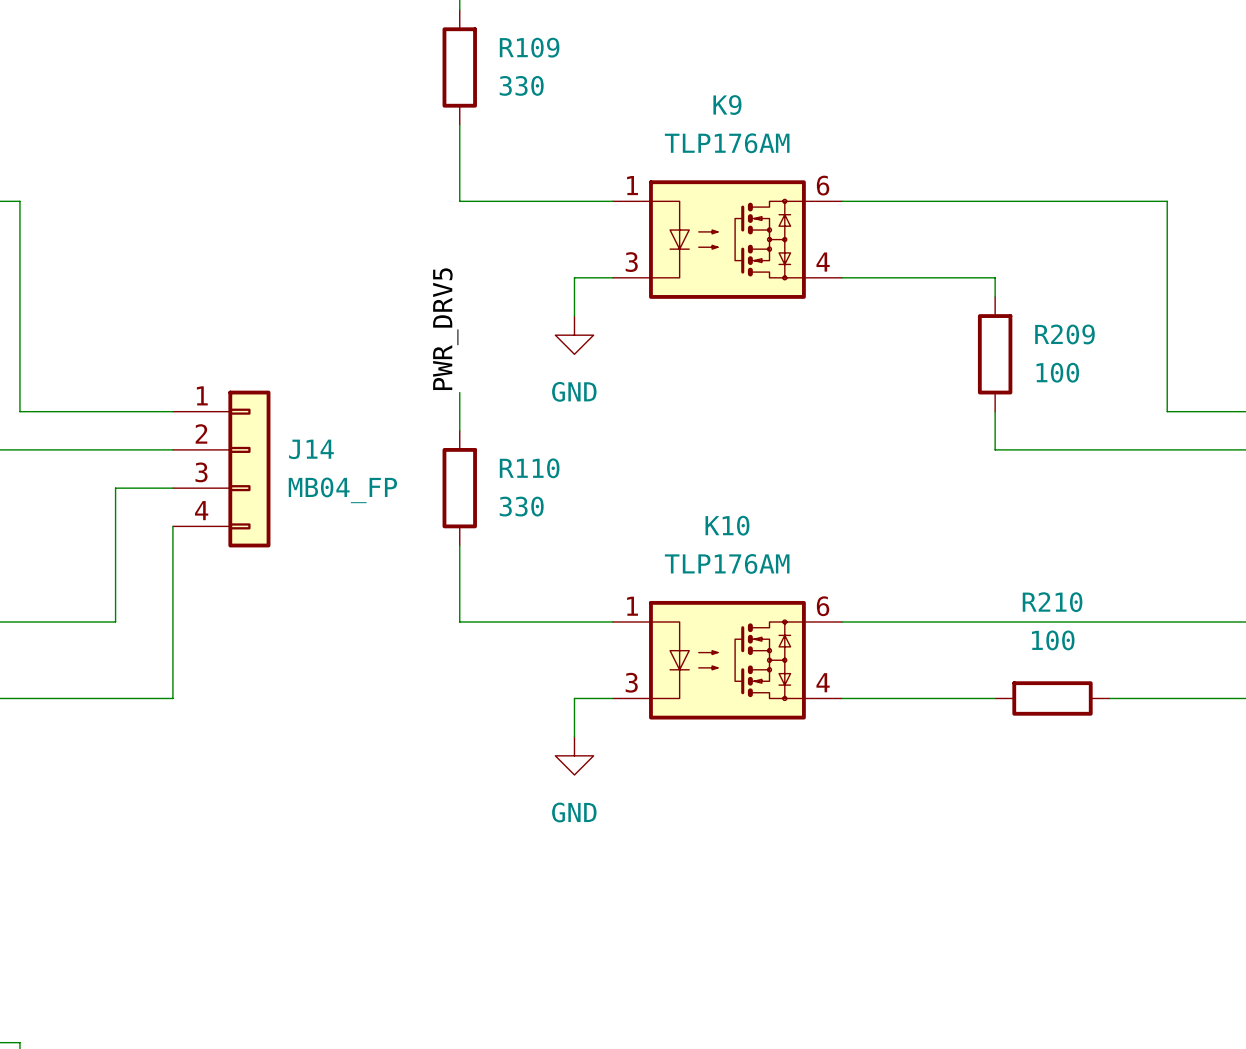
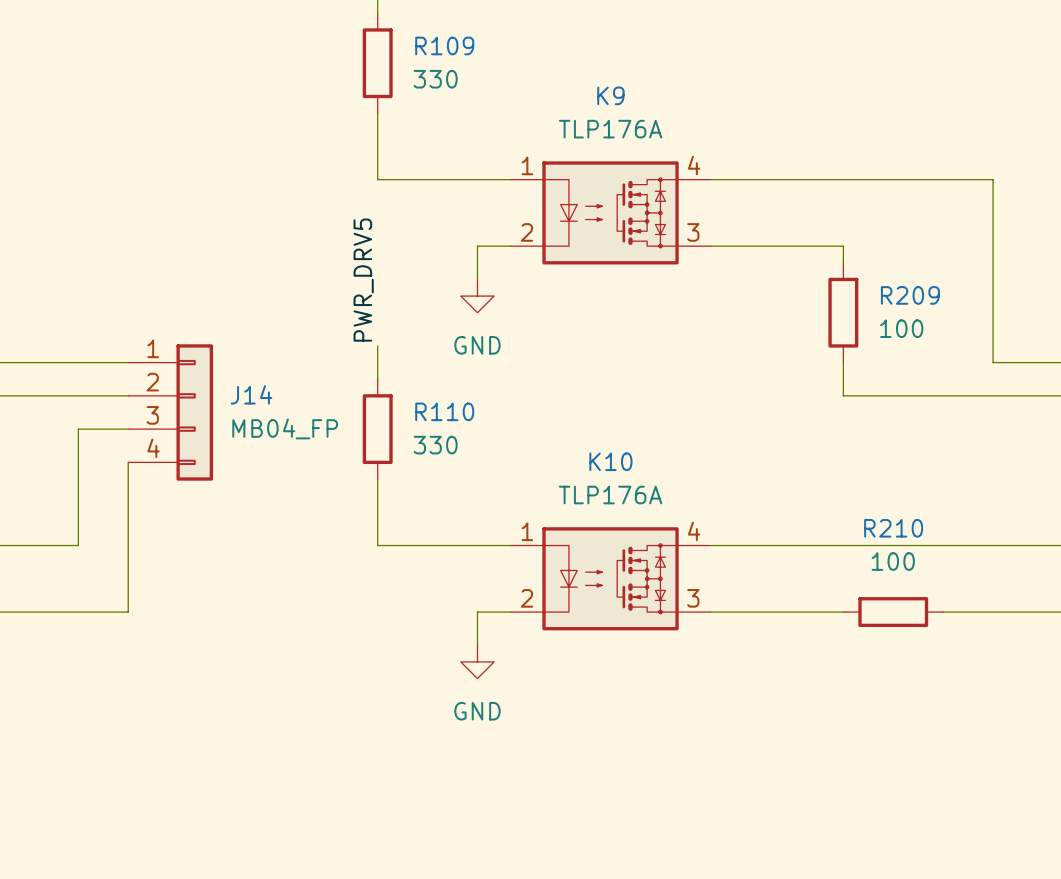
K9 value: TLP176AM (727, 143) -> TLP176A (610, 129)
K9 pin number: 6 (823, 185) -> 4 (694, 165)
K9 pin number: 3 (631, 262) -> 2 (526, 232)
K9 pin number: 4 (823, 262) -> 3 (693, 232)
K10 value: TLP176AM (727, 563) -> TLP176A (610, 495)
K10 pin number: 6 (823, 606) -> 4 (694, 531)
K10 pin number: 3 (631, 682) -> 2 (526, 598)
K10 pin number: 4 (823, 682) -> 3 (693, 598)

